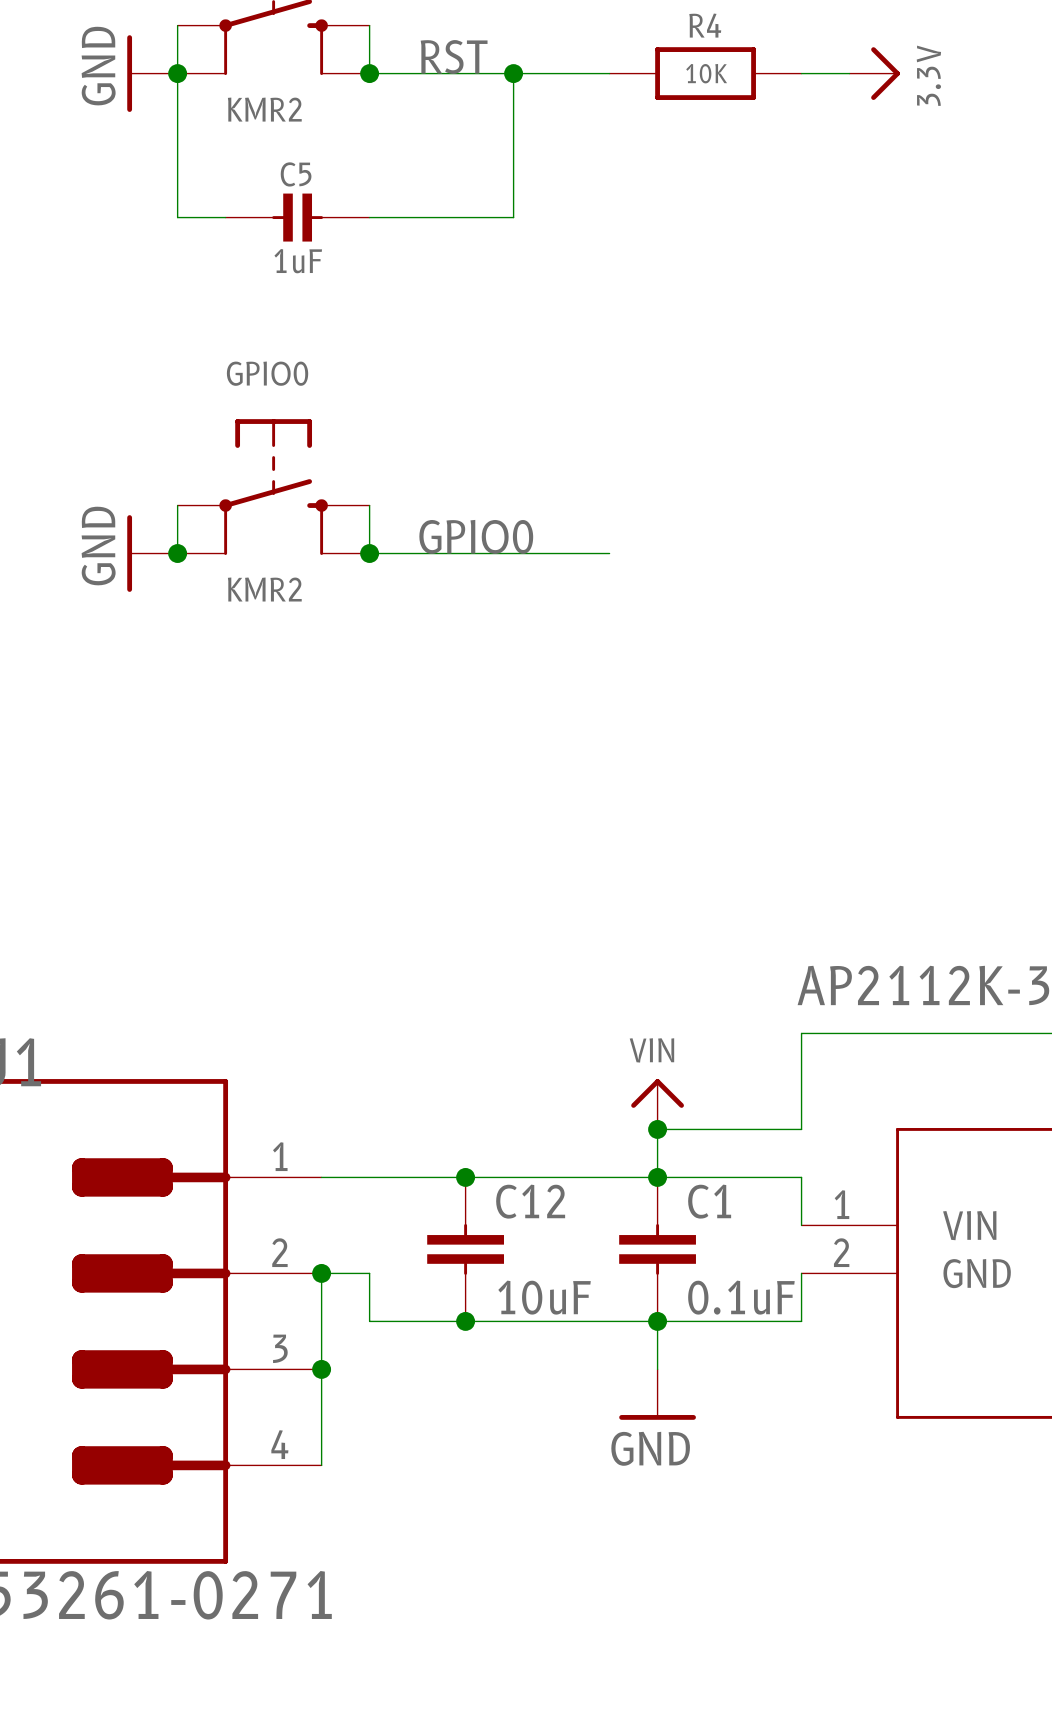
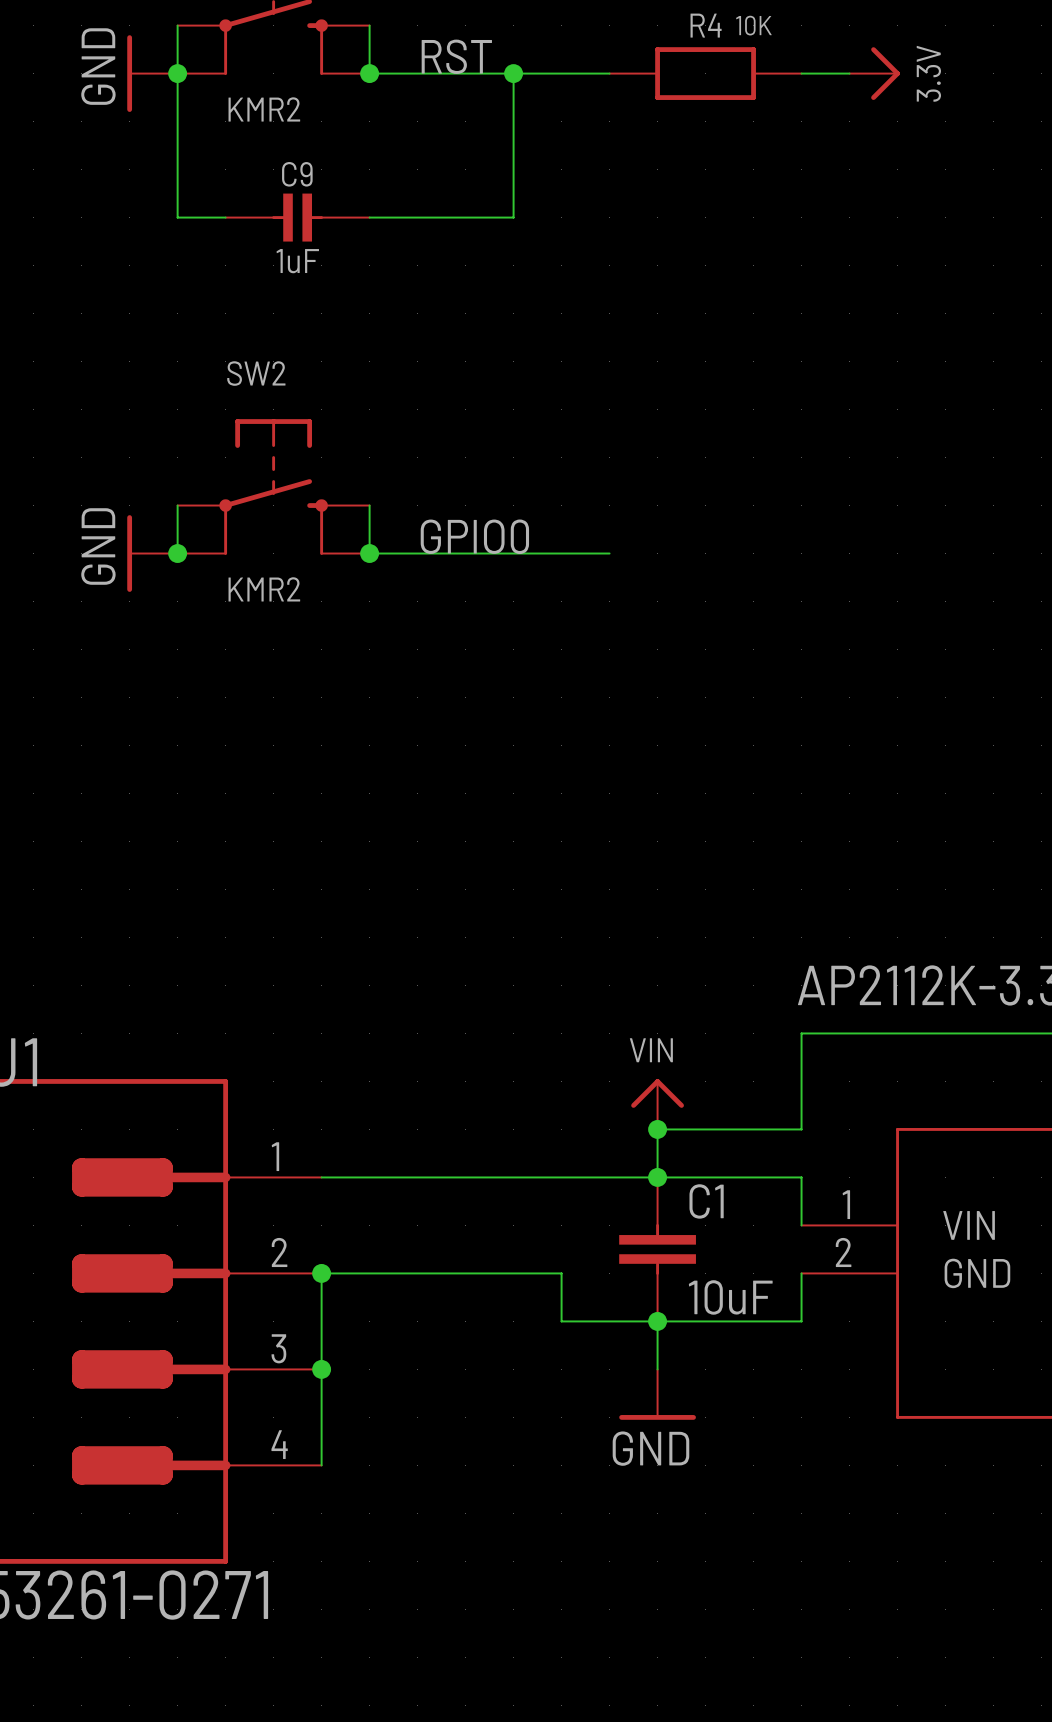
R4 value position: 10K (706, 73) -> 10K (753, 25)
C5 name: C5 (296, 174) -> C9 (297, 174)
GPIO0 name: GPIO0 (267, 373) -> SW2 (256, 373)
junction: (465, 1177) -> none
C12: 10uF (465, 1249) -> none
wire: (369, 1273) (369, 1321) (561, 1321) -> (369, 1273) (561, 1273) (561, 1321)
C1 value: 0.1uF (741, 1297) -> 10uF (730, 1297)
junction: (465, 1321) -> none

